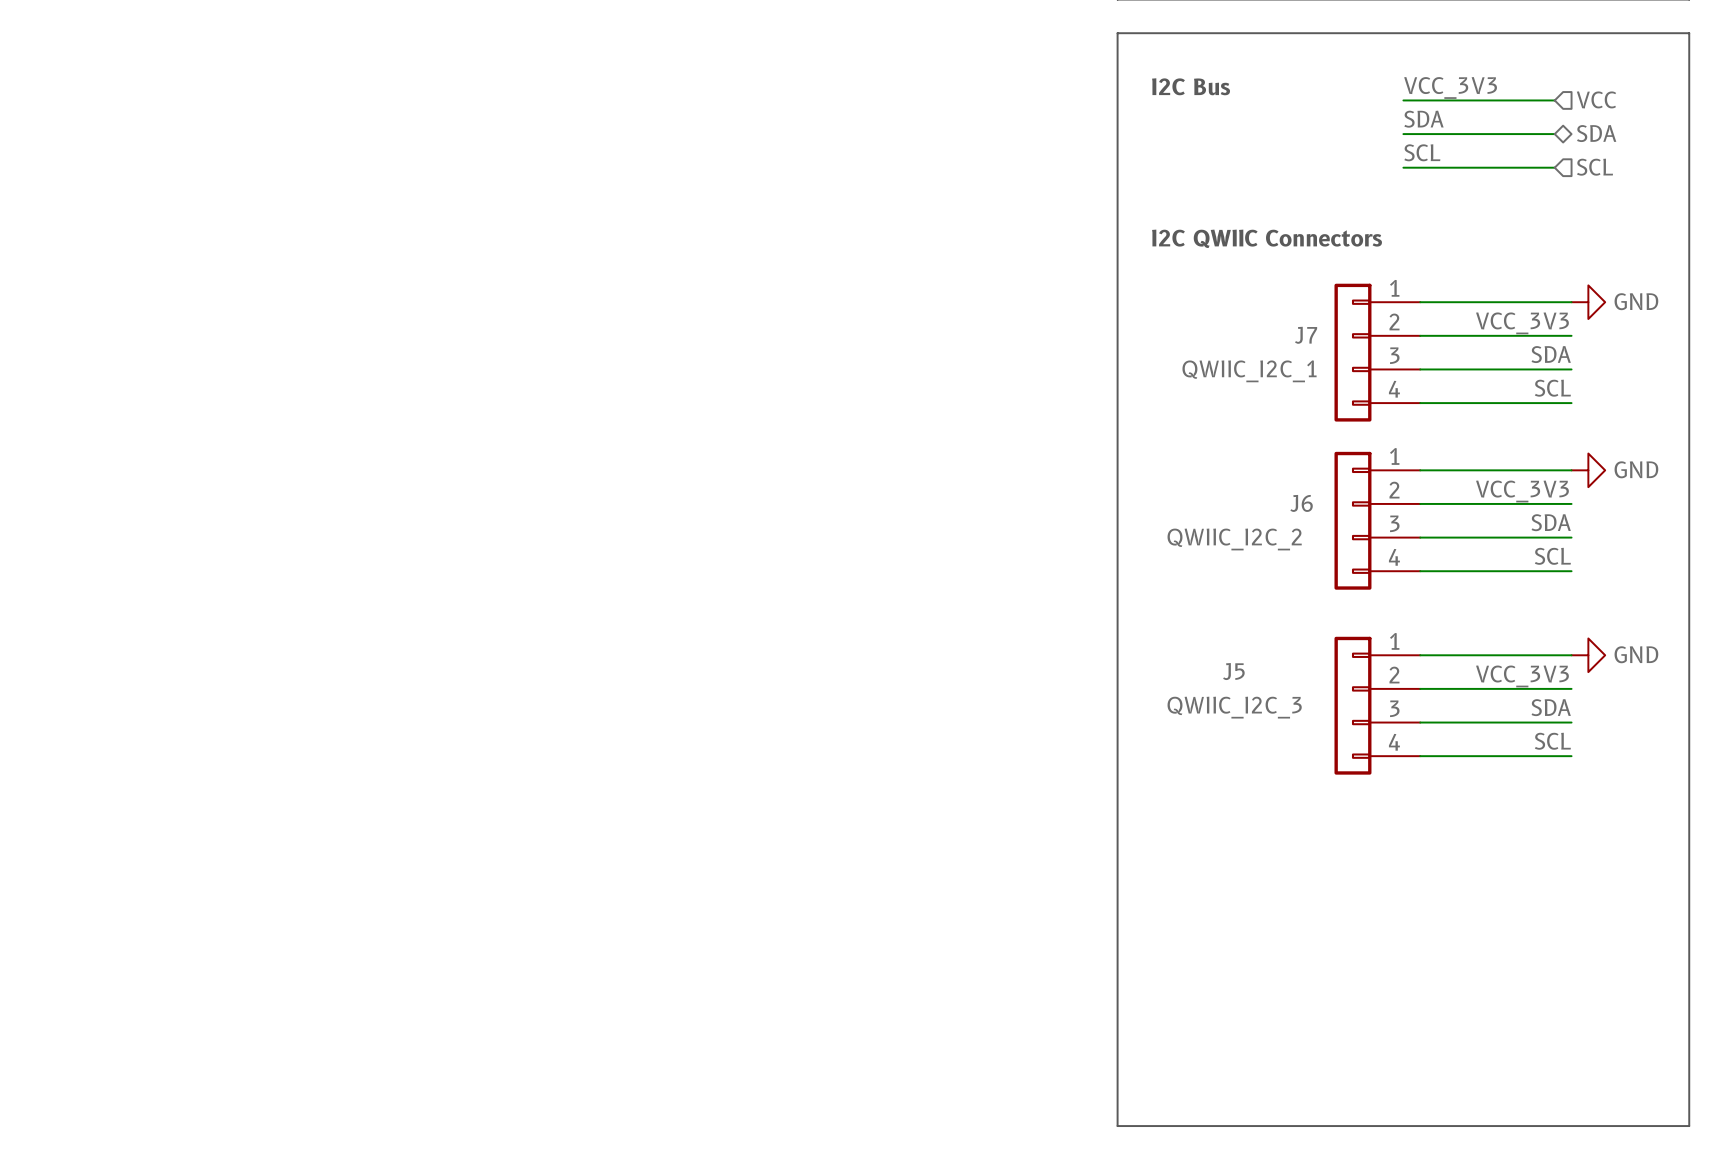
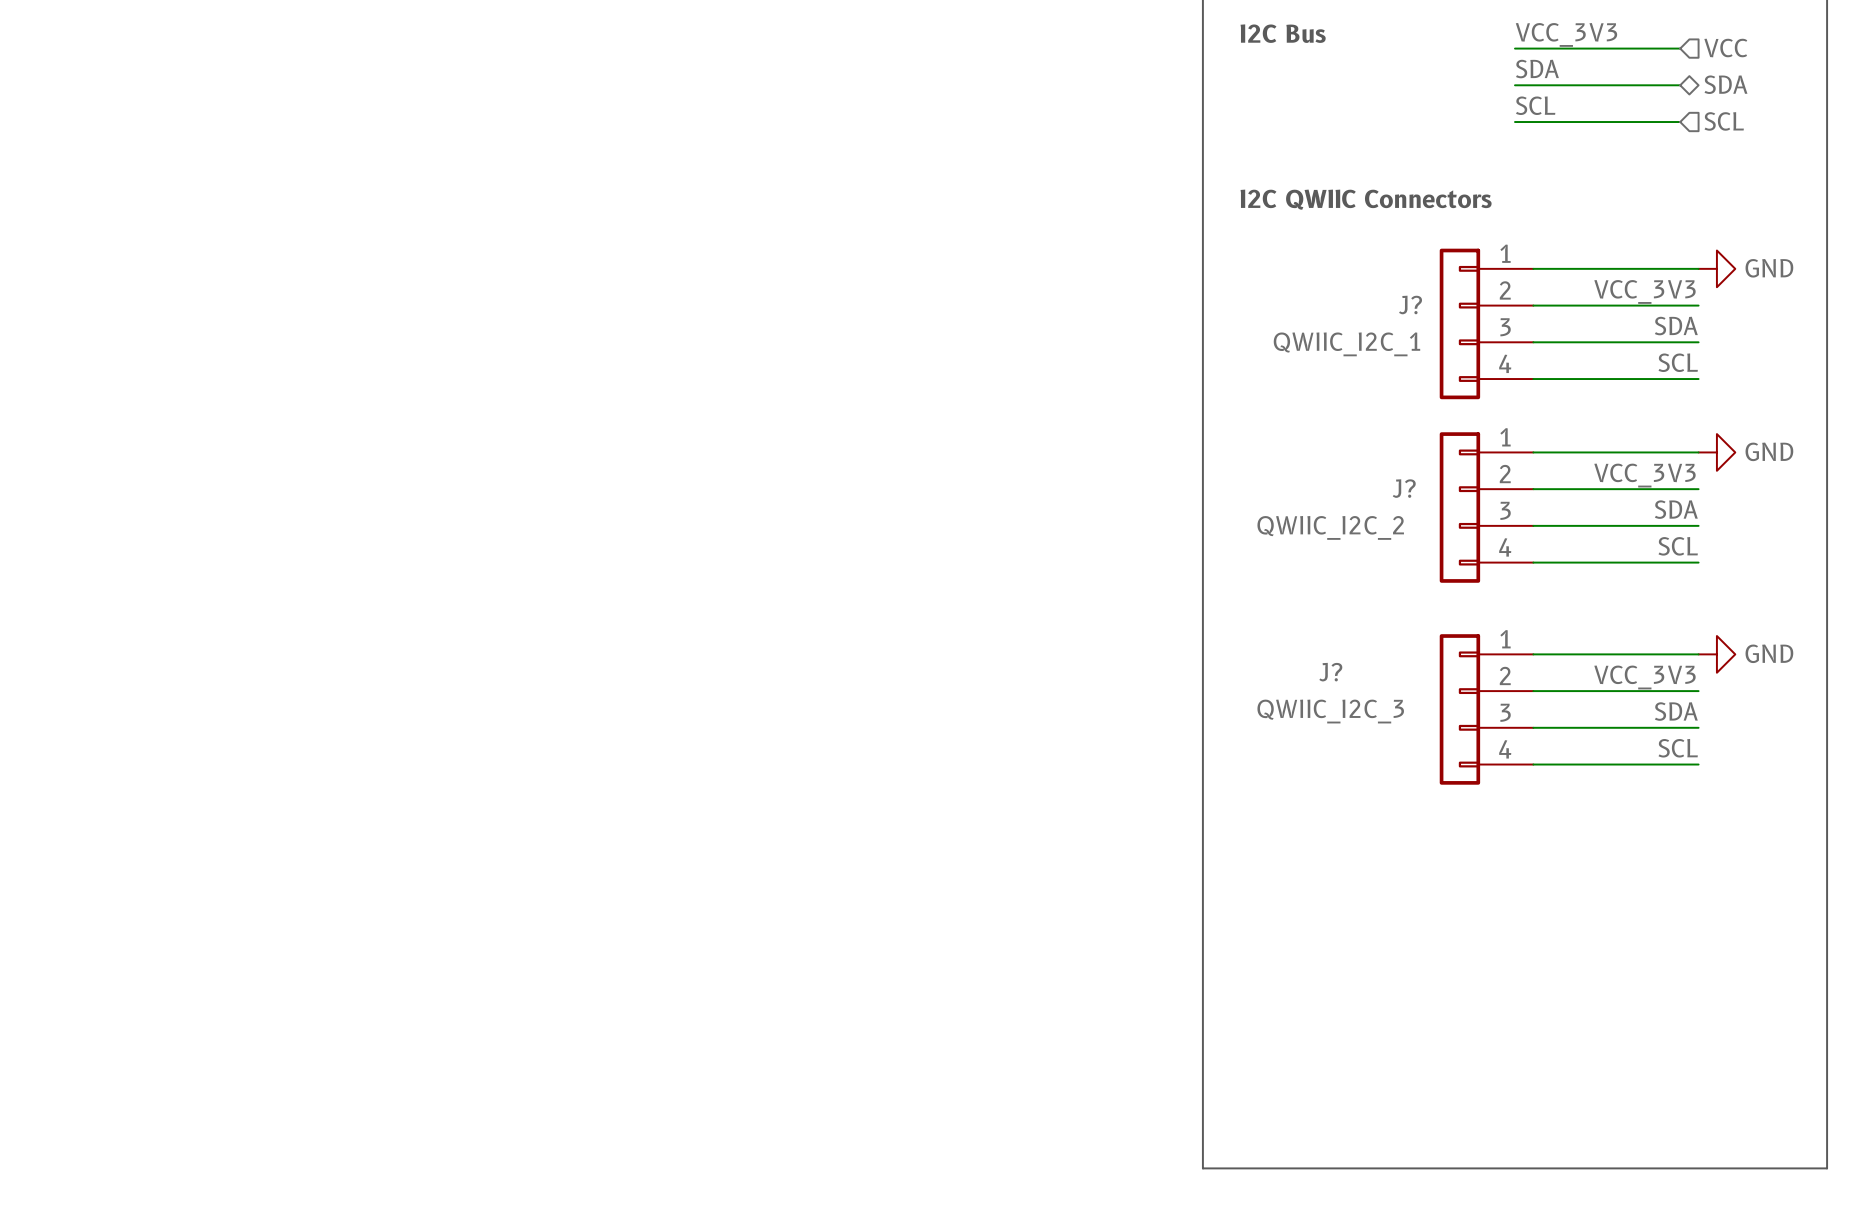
J7 name: J7 (1306, 335) -> J? (1410, 305)
J6 name: J6 (1301, 503) -> J? (1404, 488)
J5 name: J5 (1233, 671) -> J? (1330, 672)

